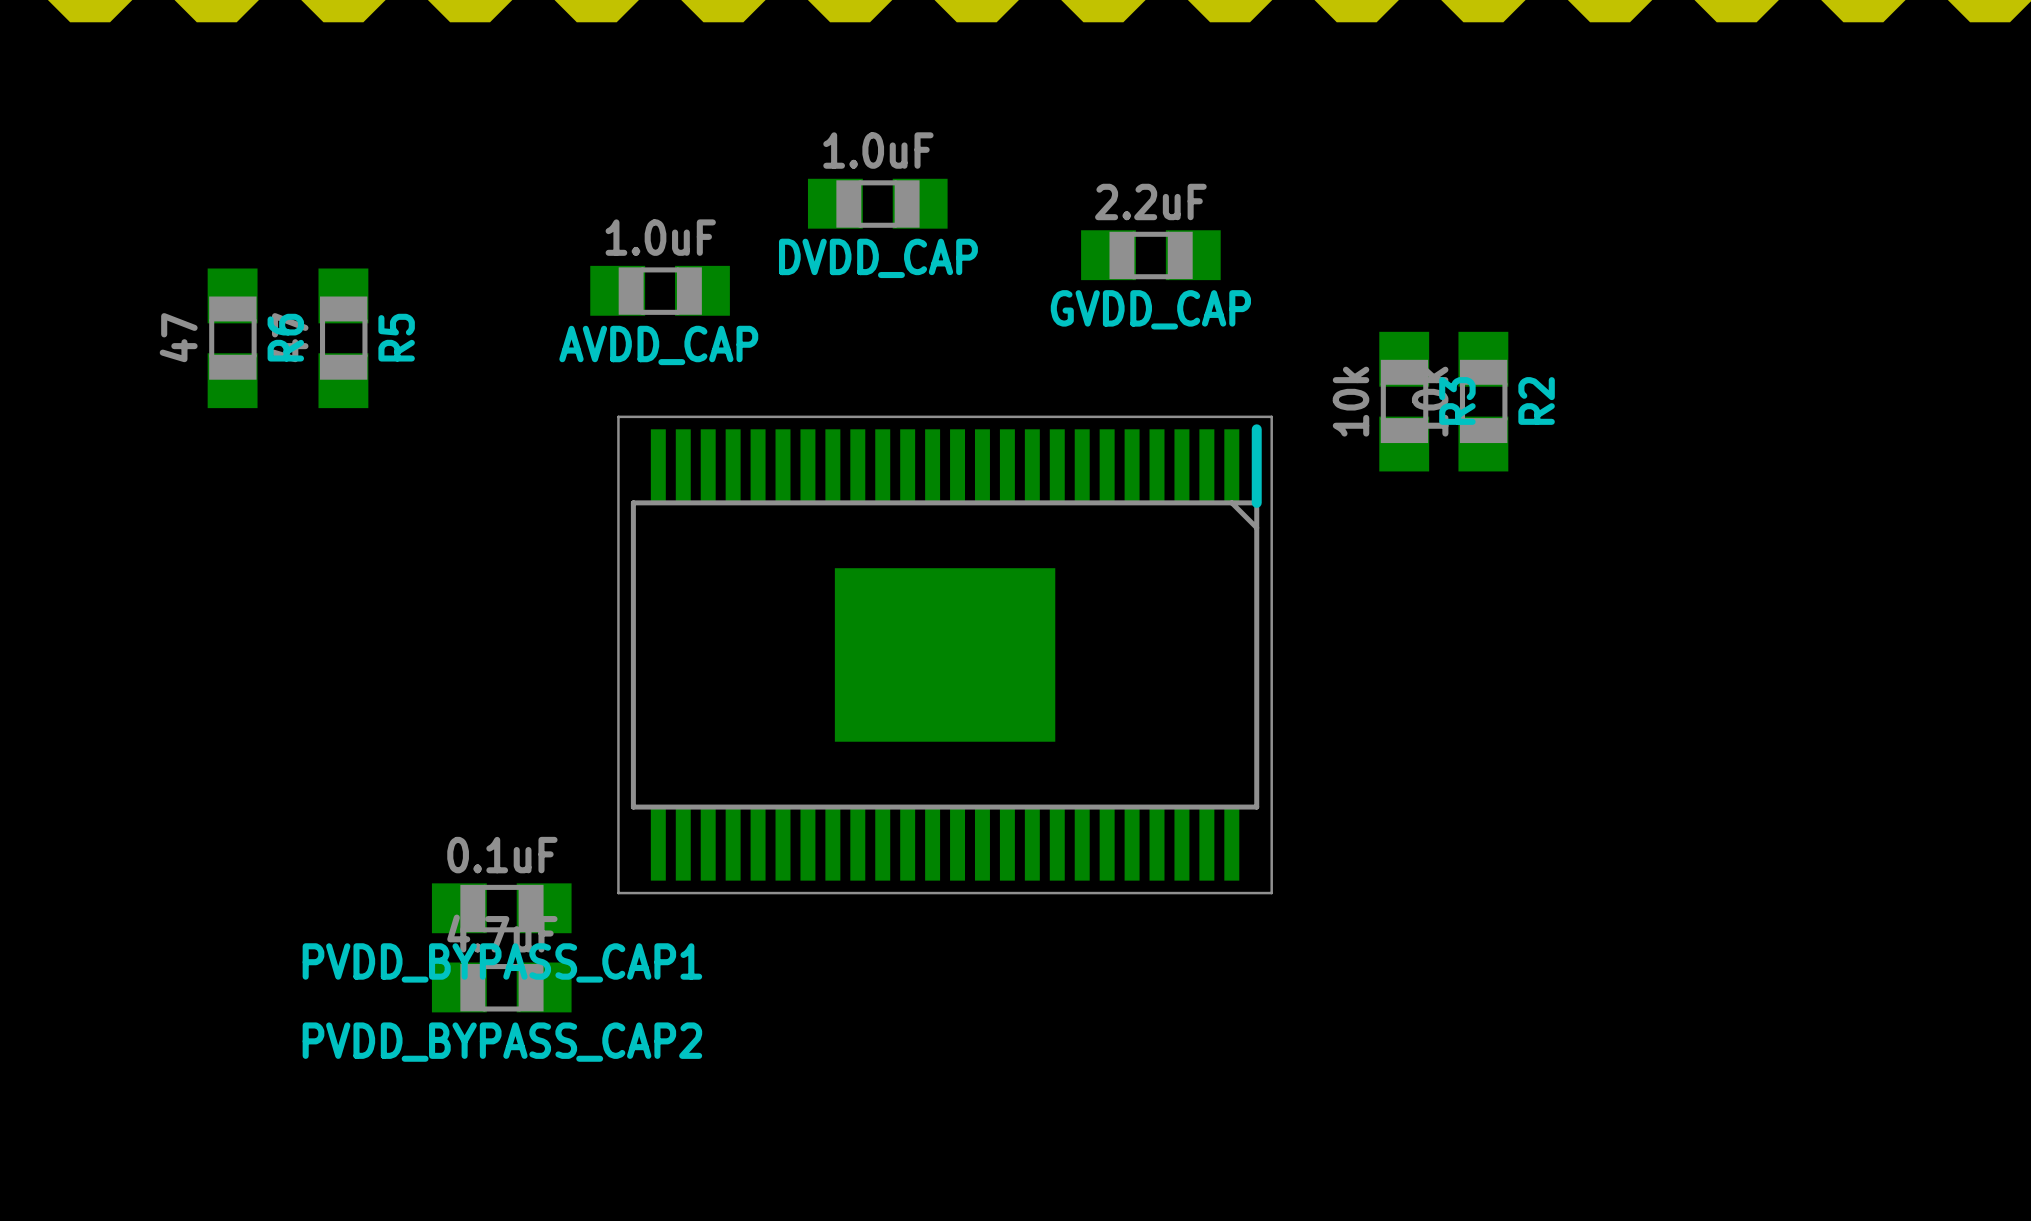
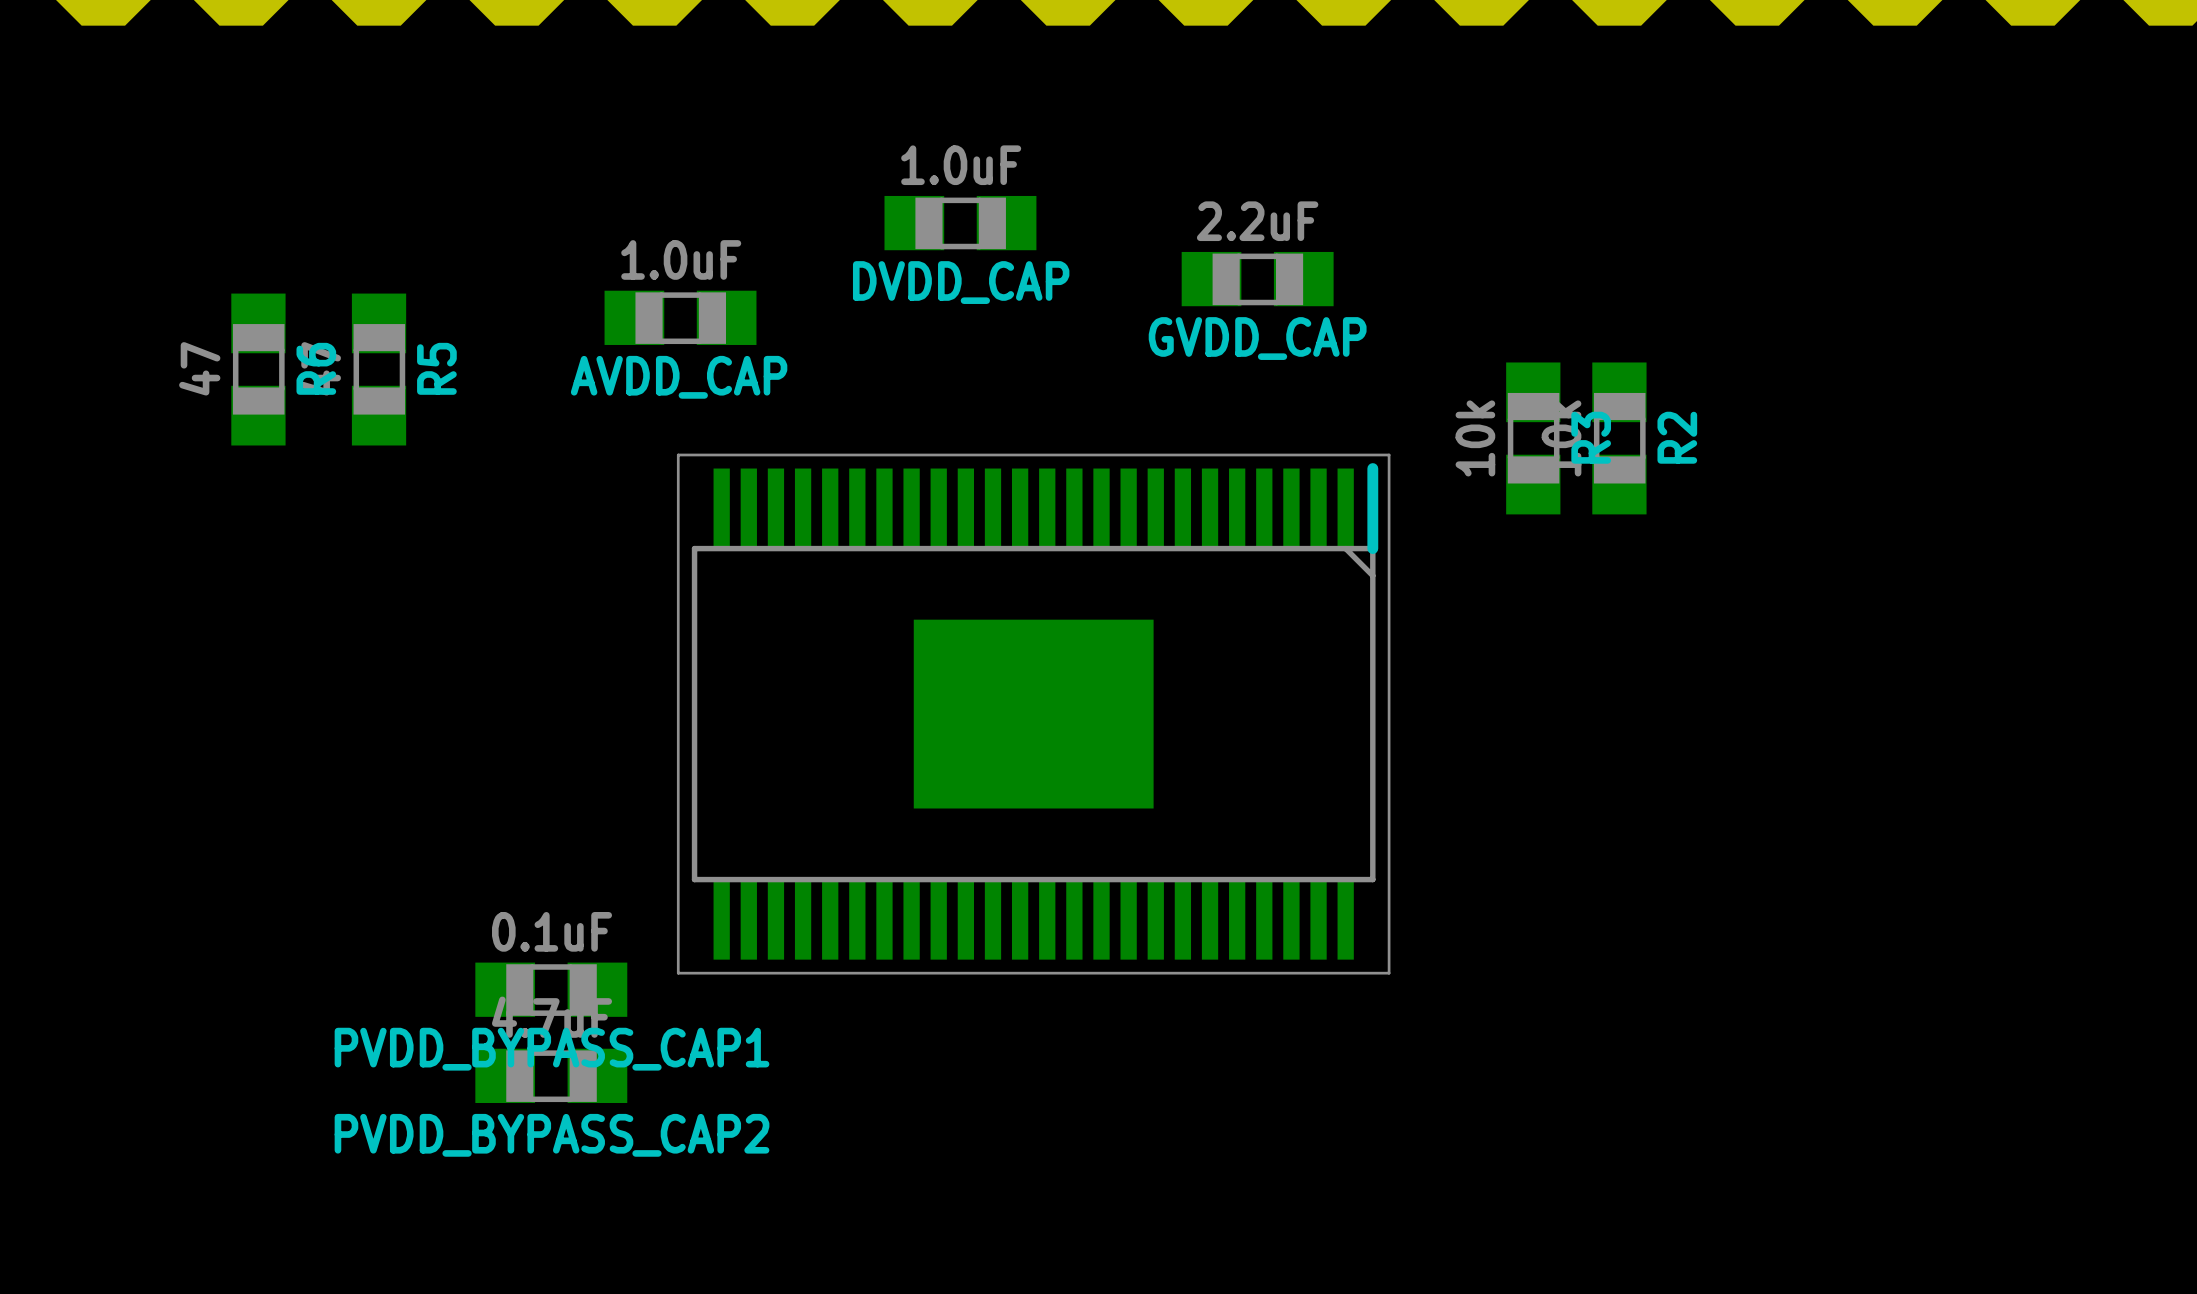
AVDD_CAP position: (660, 290) -> (680, 317)

